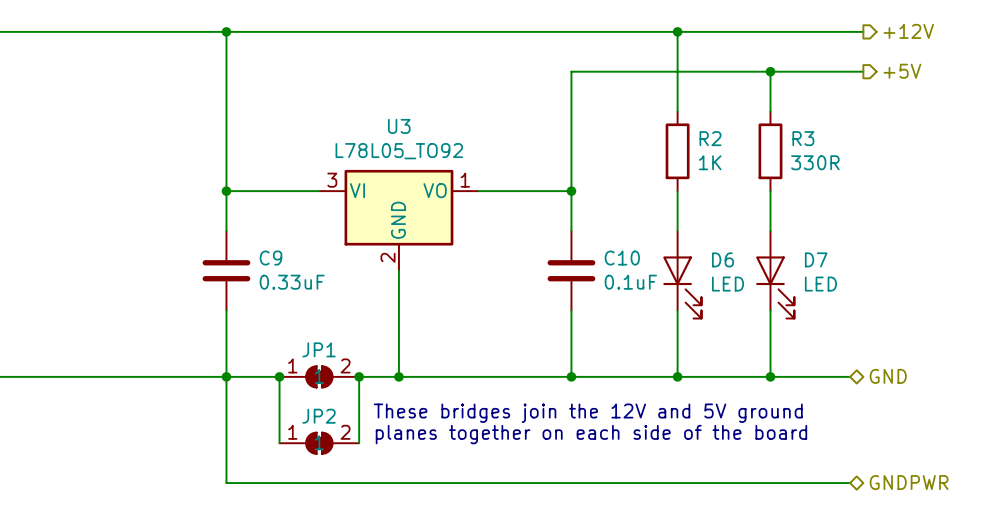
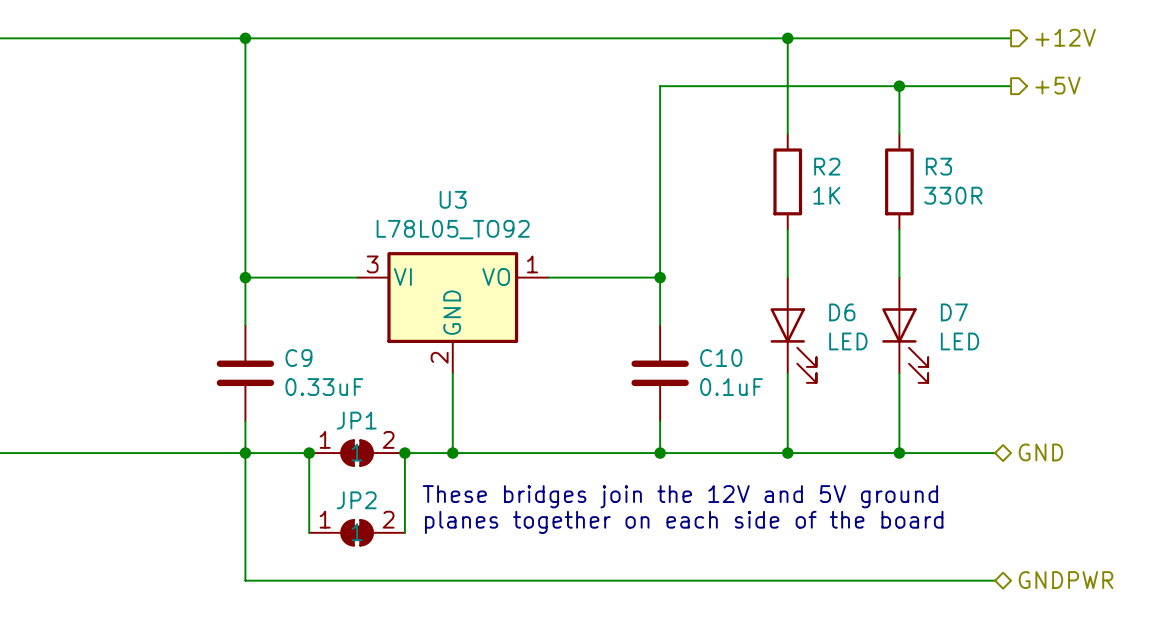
wire: (226, 191) (319, 191) -> none
junction position: (226, 191) -> (245, 277)
wire: (478, 191) (571, 191) -> none
junction position: (571, 191) -> (660, 277)
U3 position: (398, 220) -> (452, 312)
wire: none -> (357, 277) (245, 277) (245, 325)
wire: none -> (548, 277) (660, 277) (660, 325)
C9 position: (226, 270) -> (245, 373)
C10 position: (571, 270) -> (660, 373)

